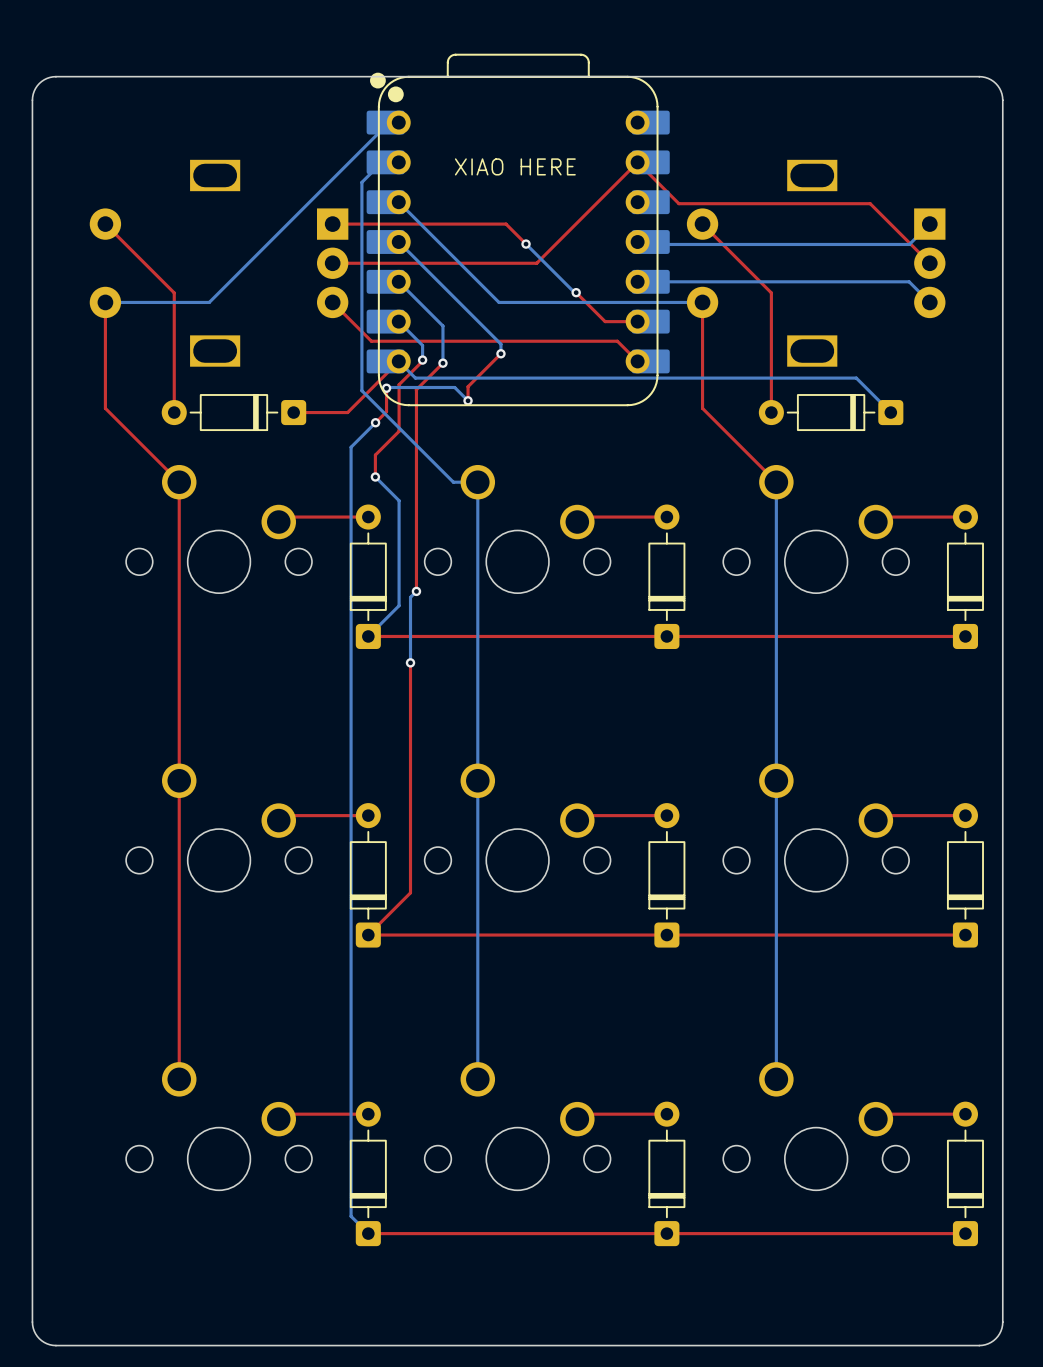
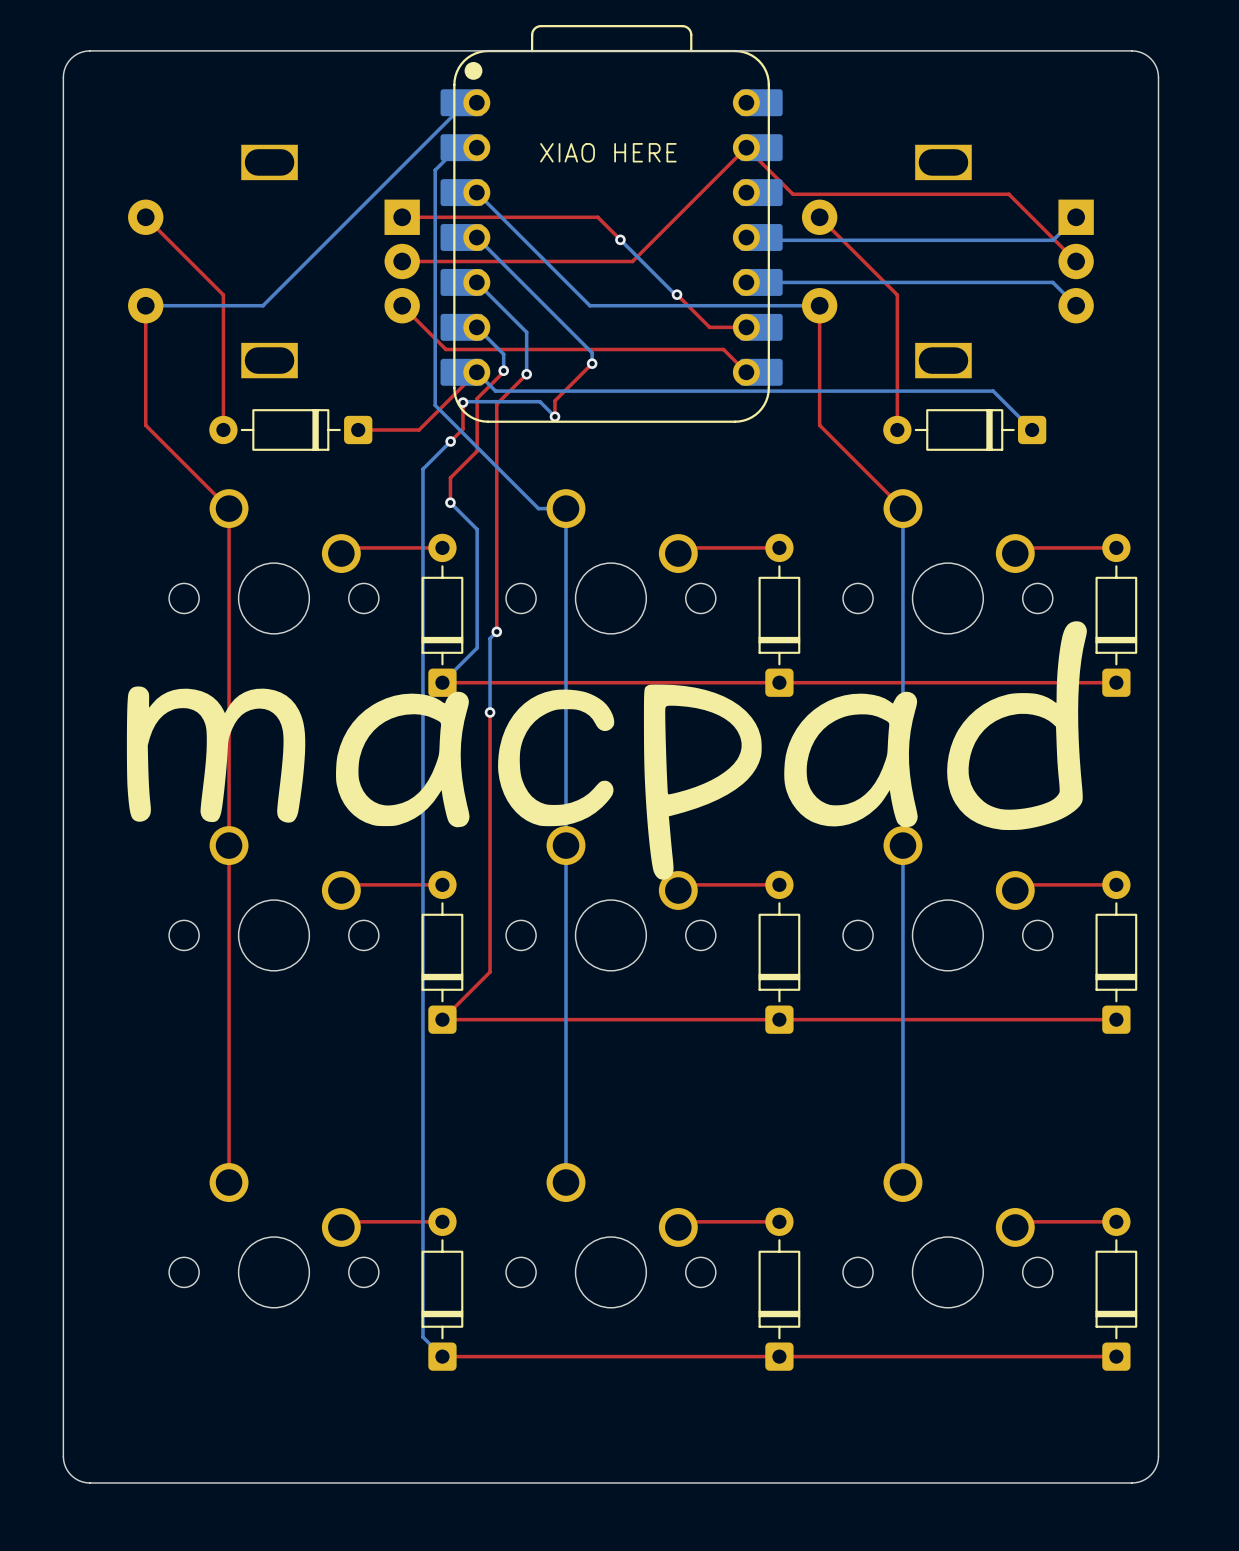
part footprint: [366, 53, 670, 407] -> [440, 24, 783, 423]
drawing: none -> [126, 621, 1087, 880]

